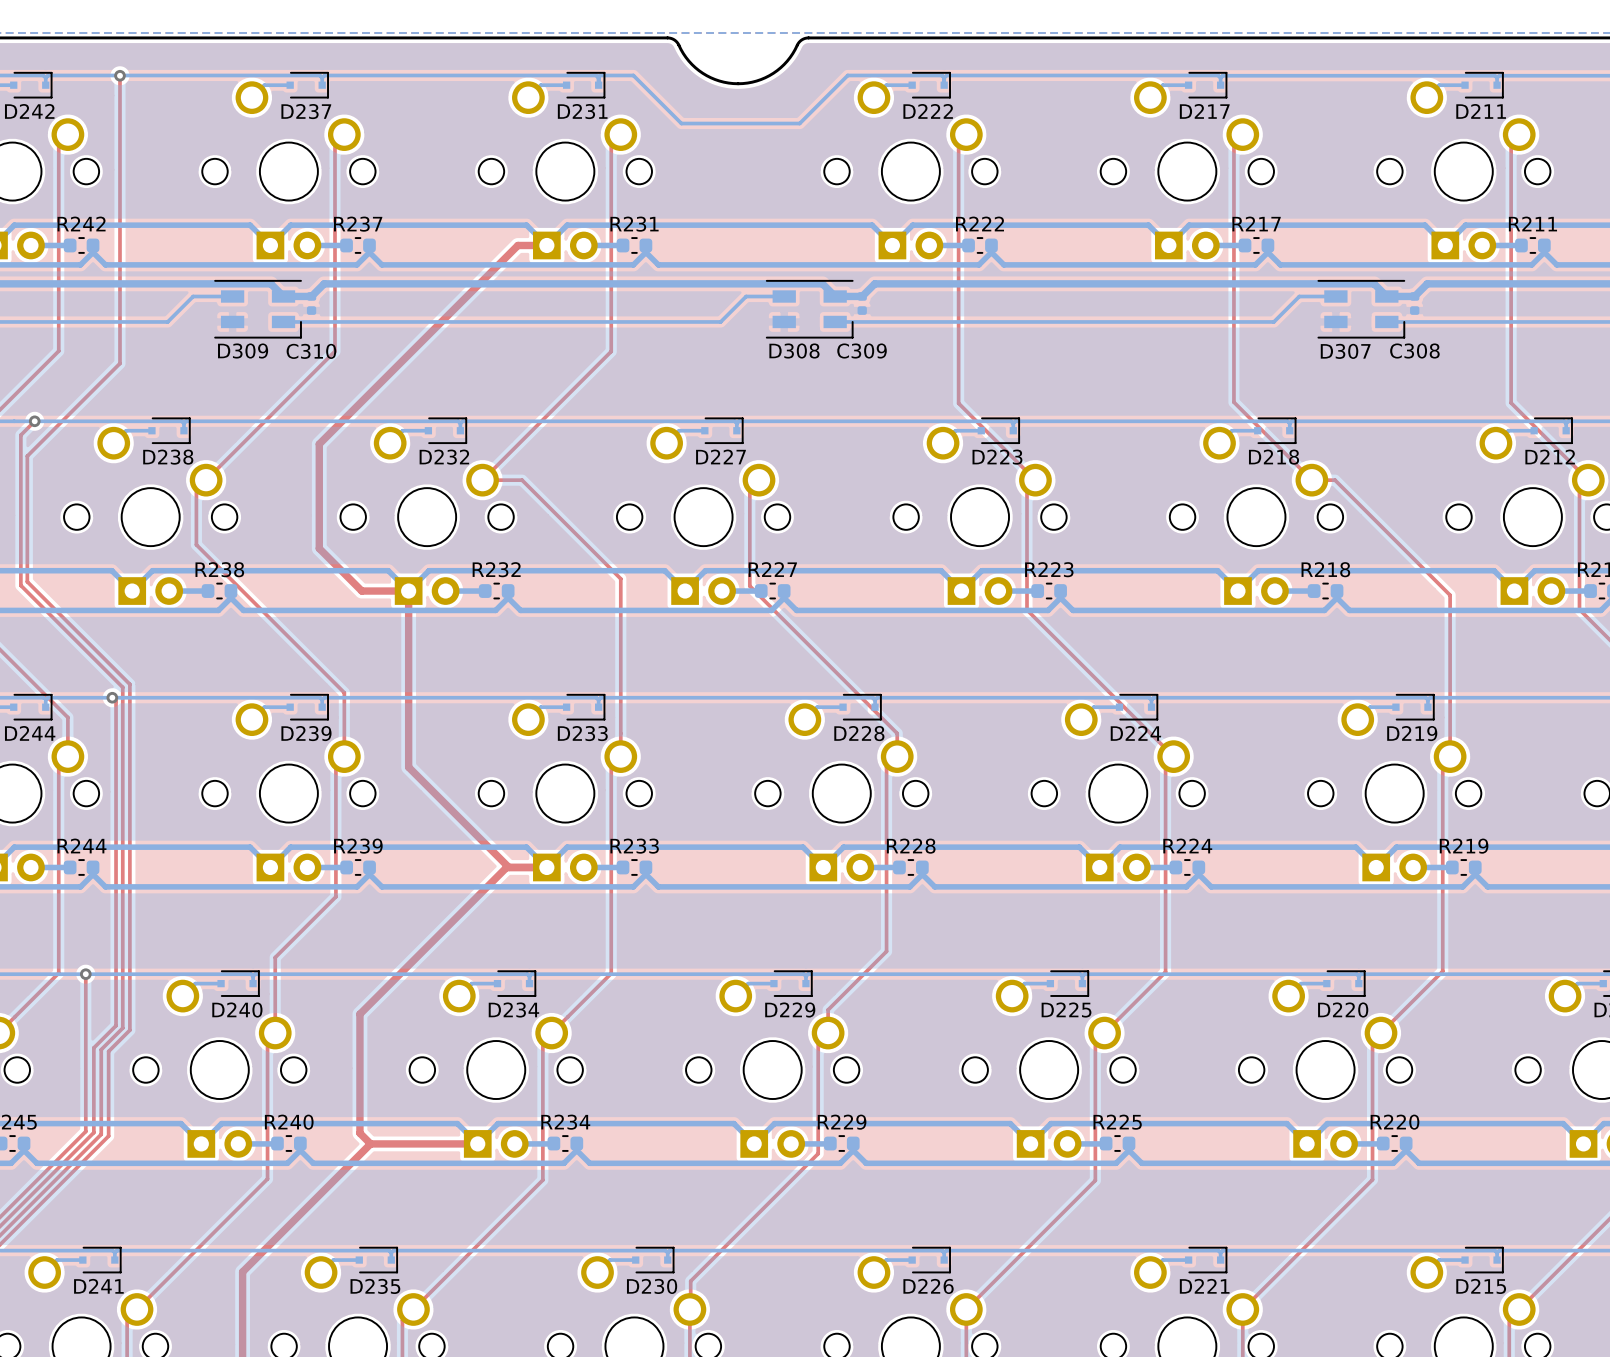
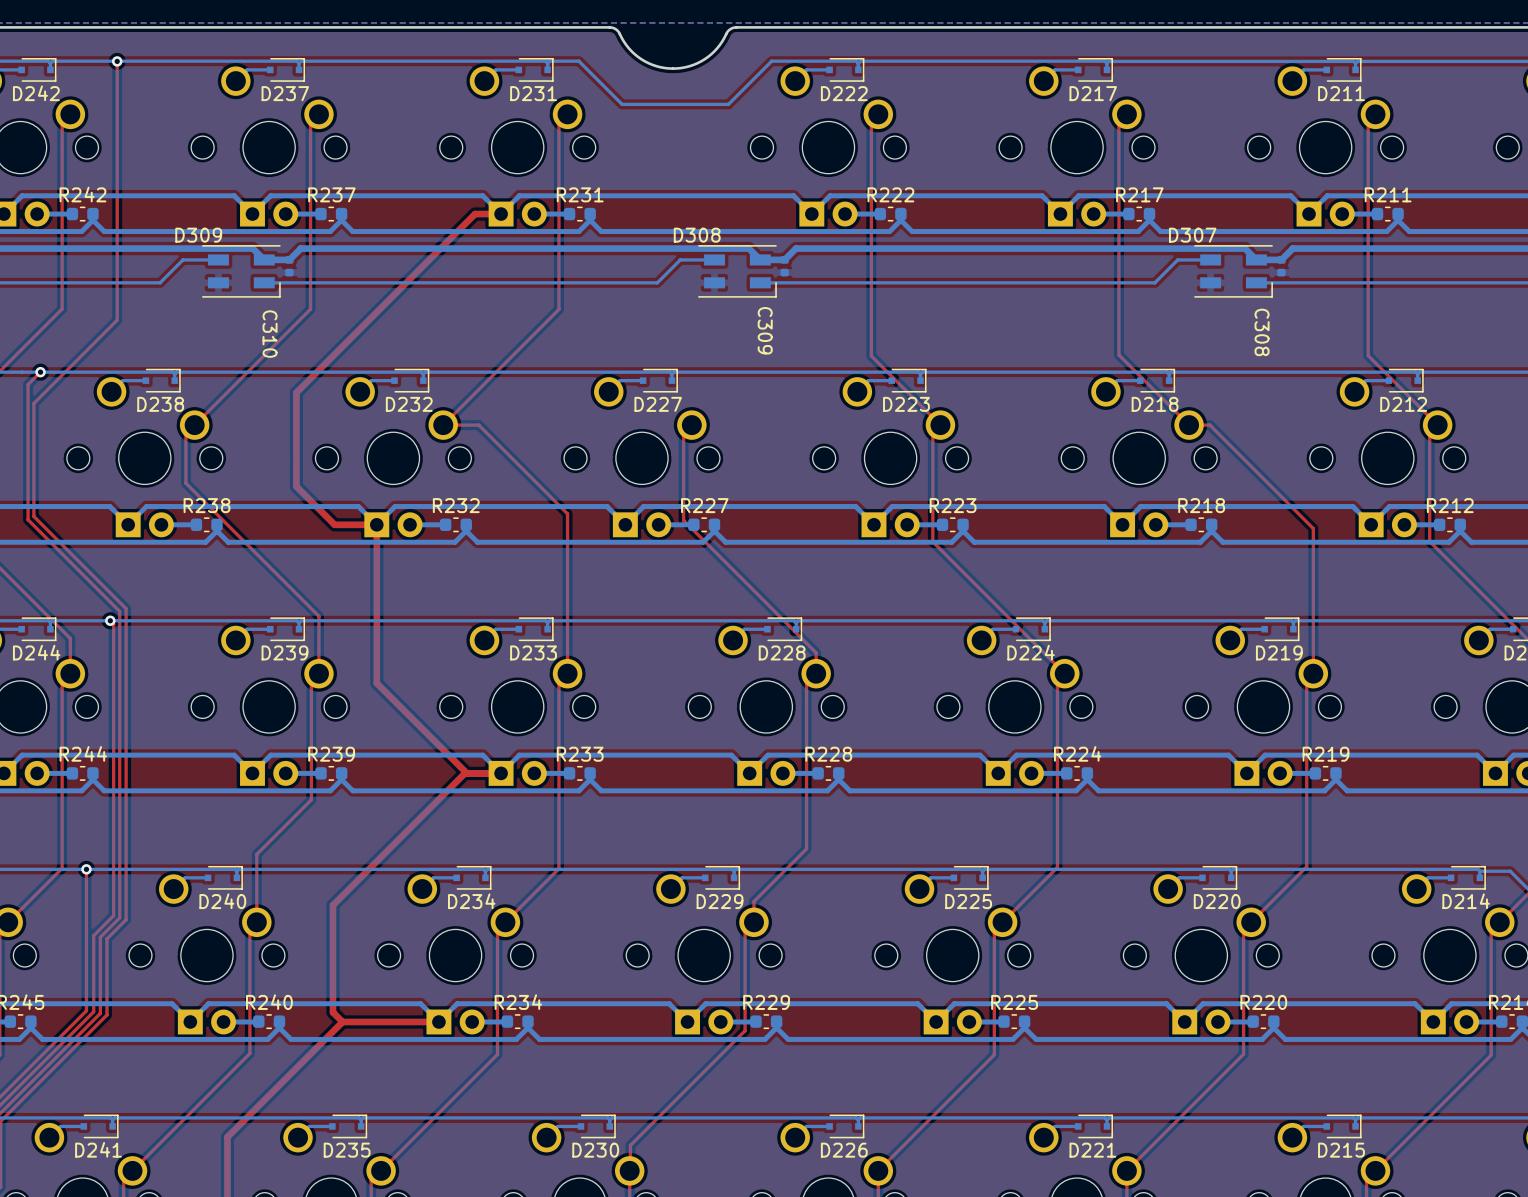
D309 name position: D309 (243, 351) -> D309 (198, 235)
C310 name rotation: 0° (311, 351) -> 90° clockwise (270, 334)
D308 name position: D308 (794, 351) -> D308 (697, 235)
C309 name rotation: 0° (862, 351) -> 90° clockwise (765, 330)
D307 name position: D307 (1345, 351) -> D307 (1192, 235)
C308 name rotation: 0° (1414, 351) -> 90° clockwise (1262, 332)

